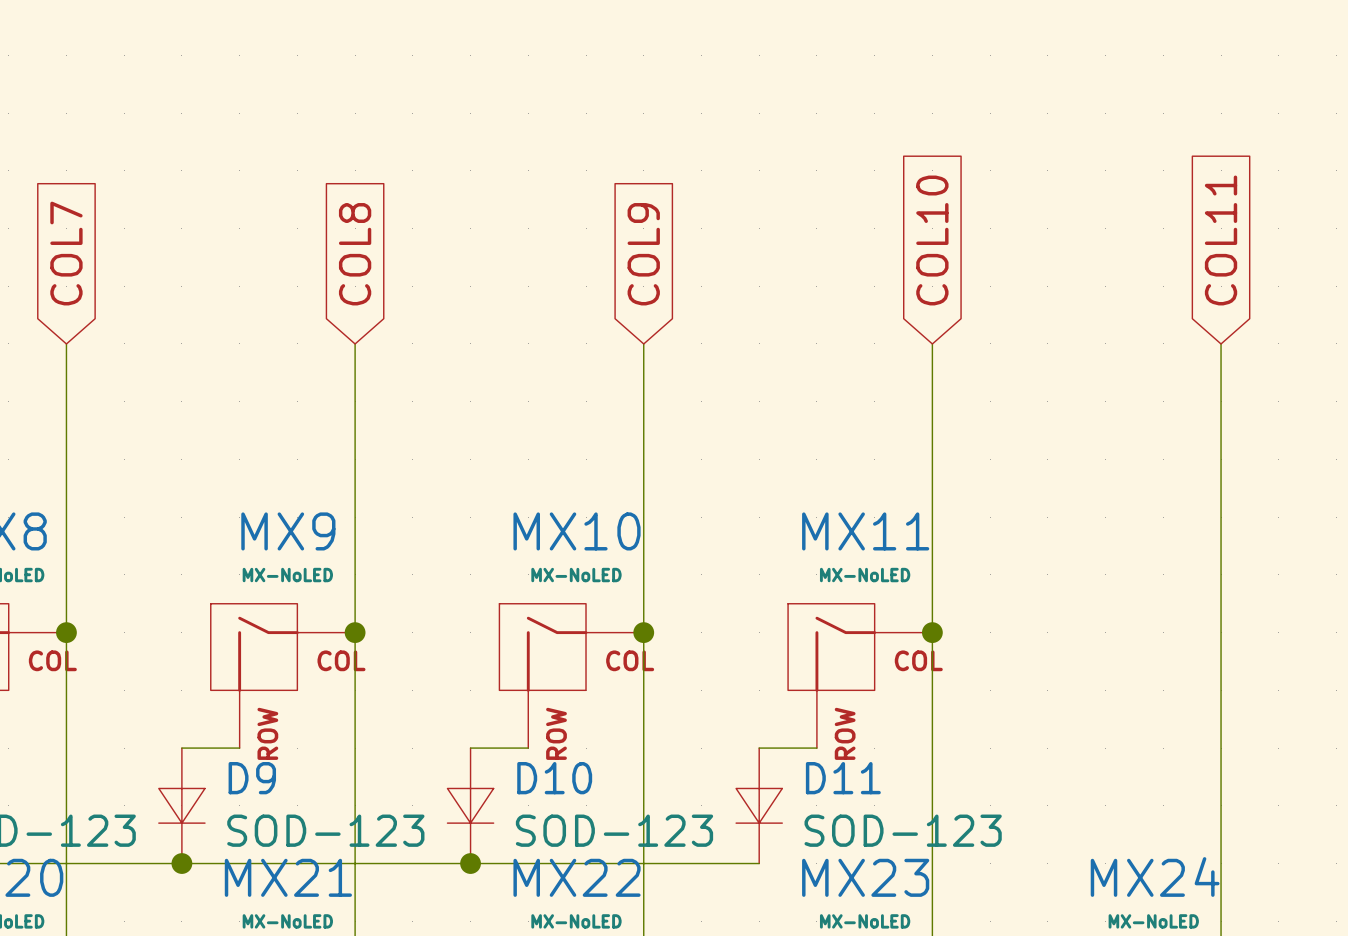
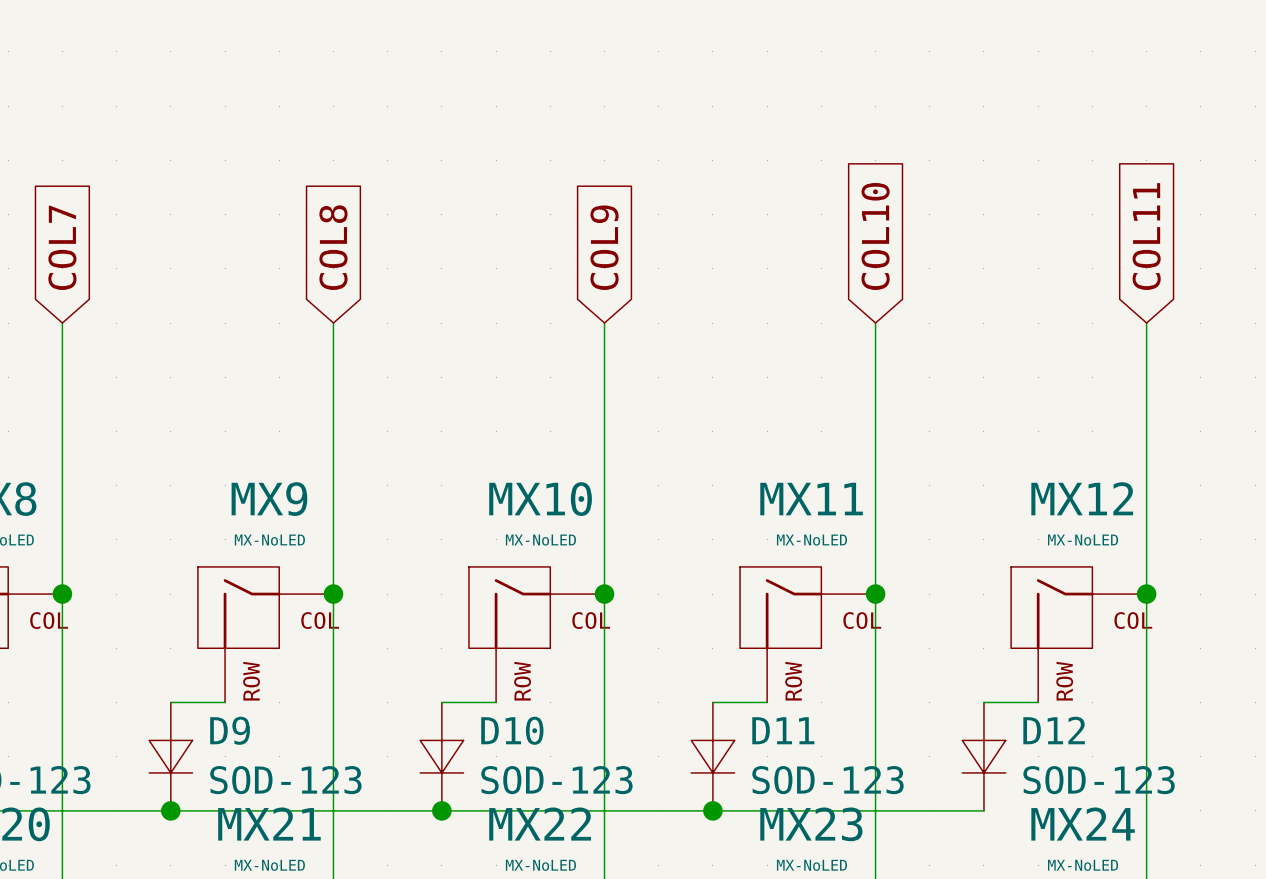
junction: none -> (1146, 594)
MX12: none -> MX-NoLED (1078, 634)
wire: none -> (983, 702) (1038, 702)
D12: none -> SOD-123 (983, 756)
wire: none -> (712, 810) (983, 810)
junction: none -> (712, 810)

